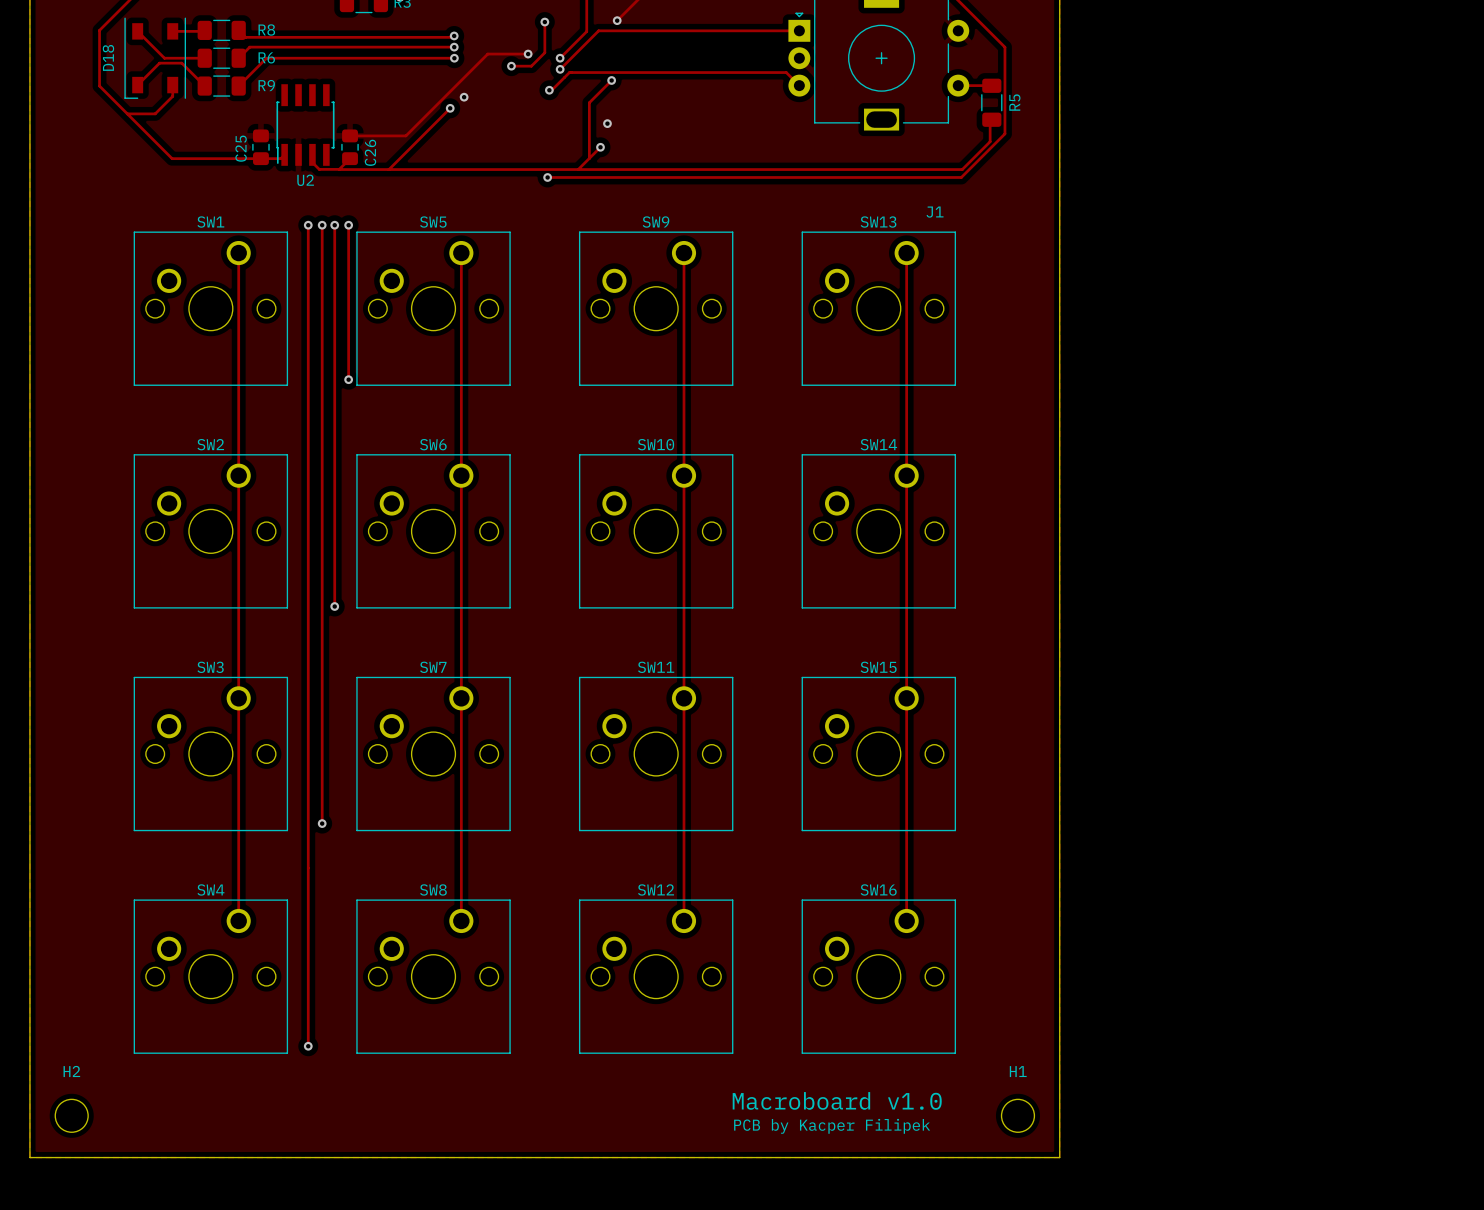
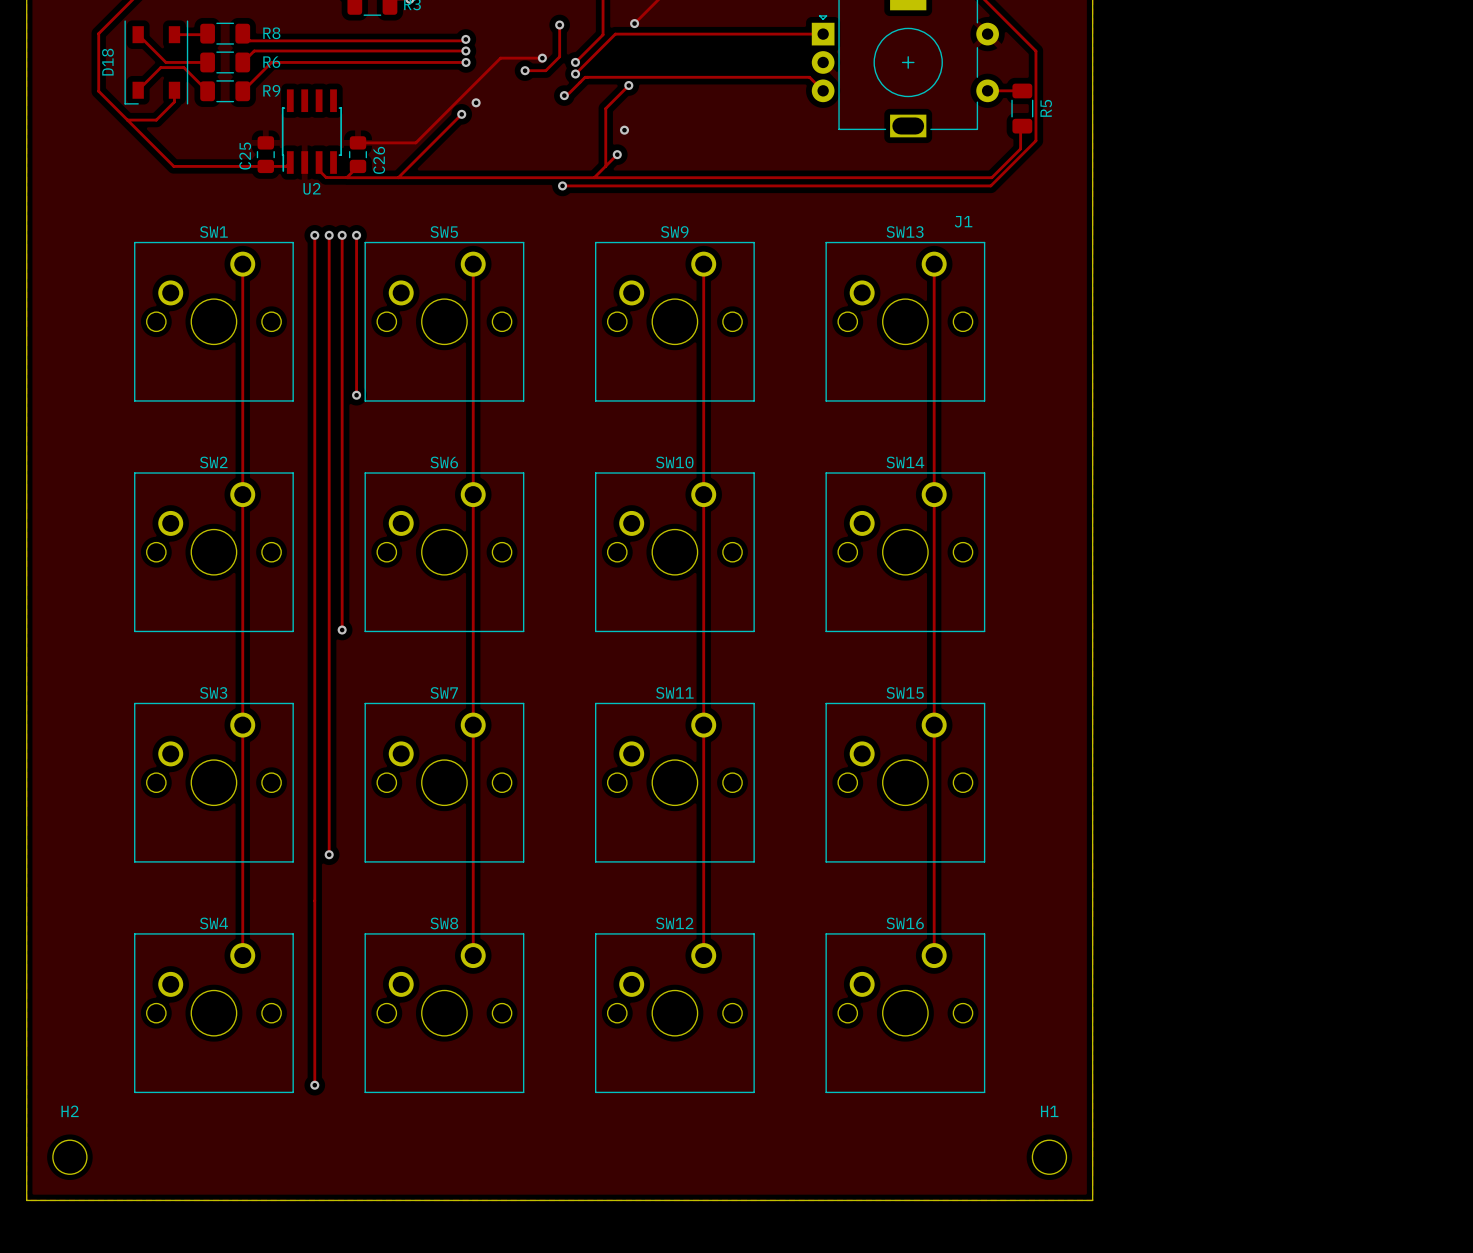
text: Macroboard v1.0 (837, 1100) -> none
text: PCB by Kacper Filipek (832, 1126) -> none

